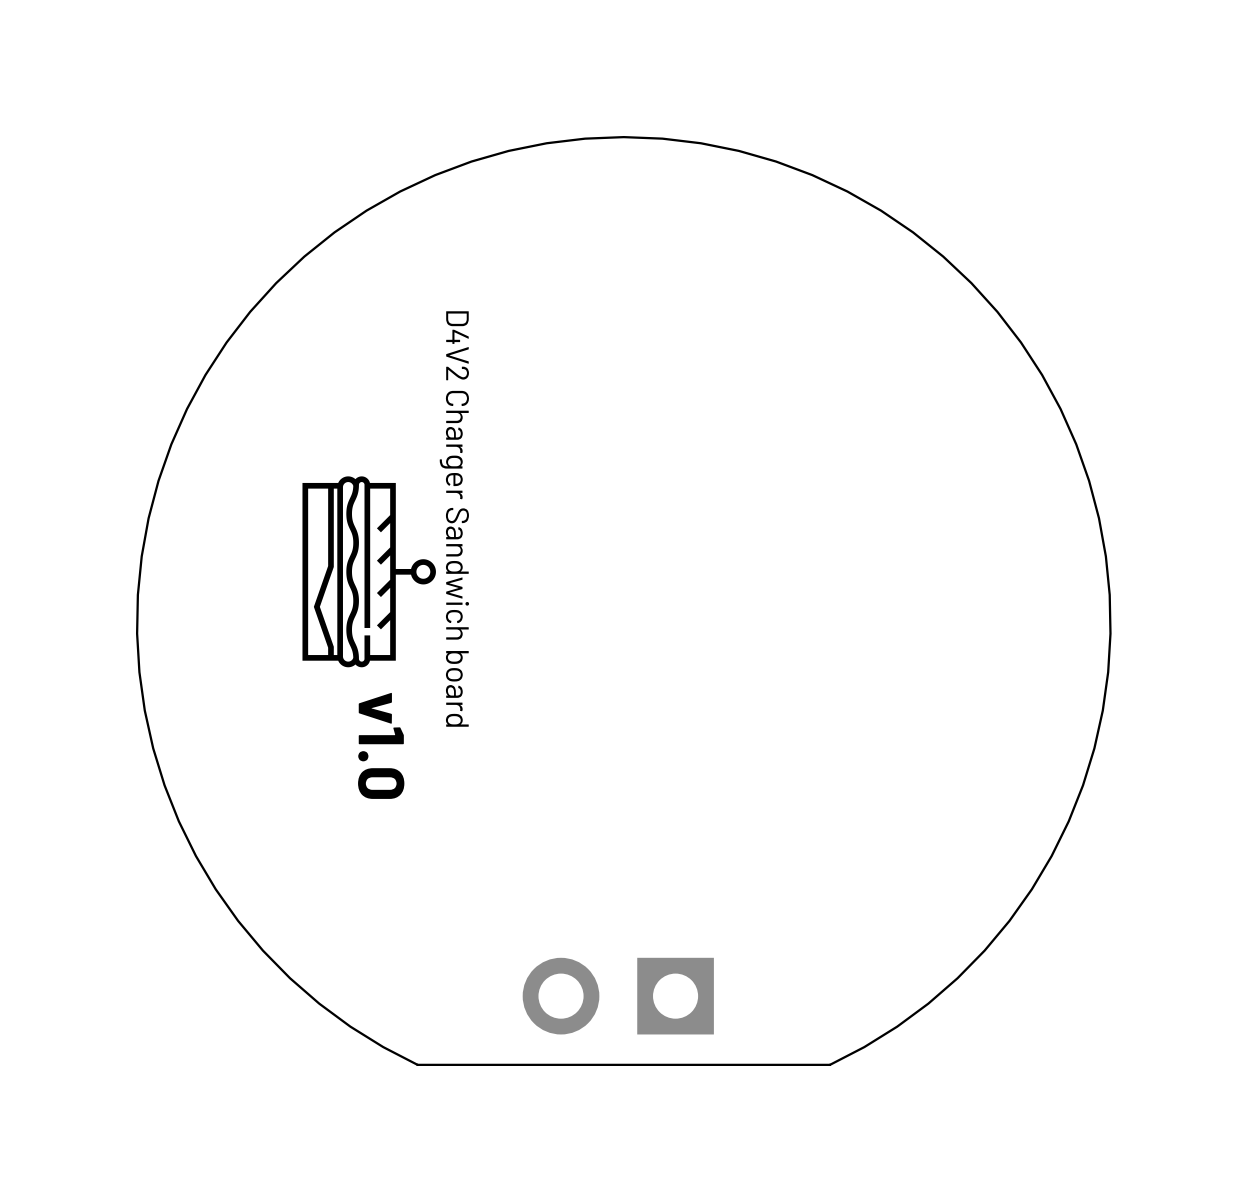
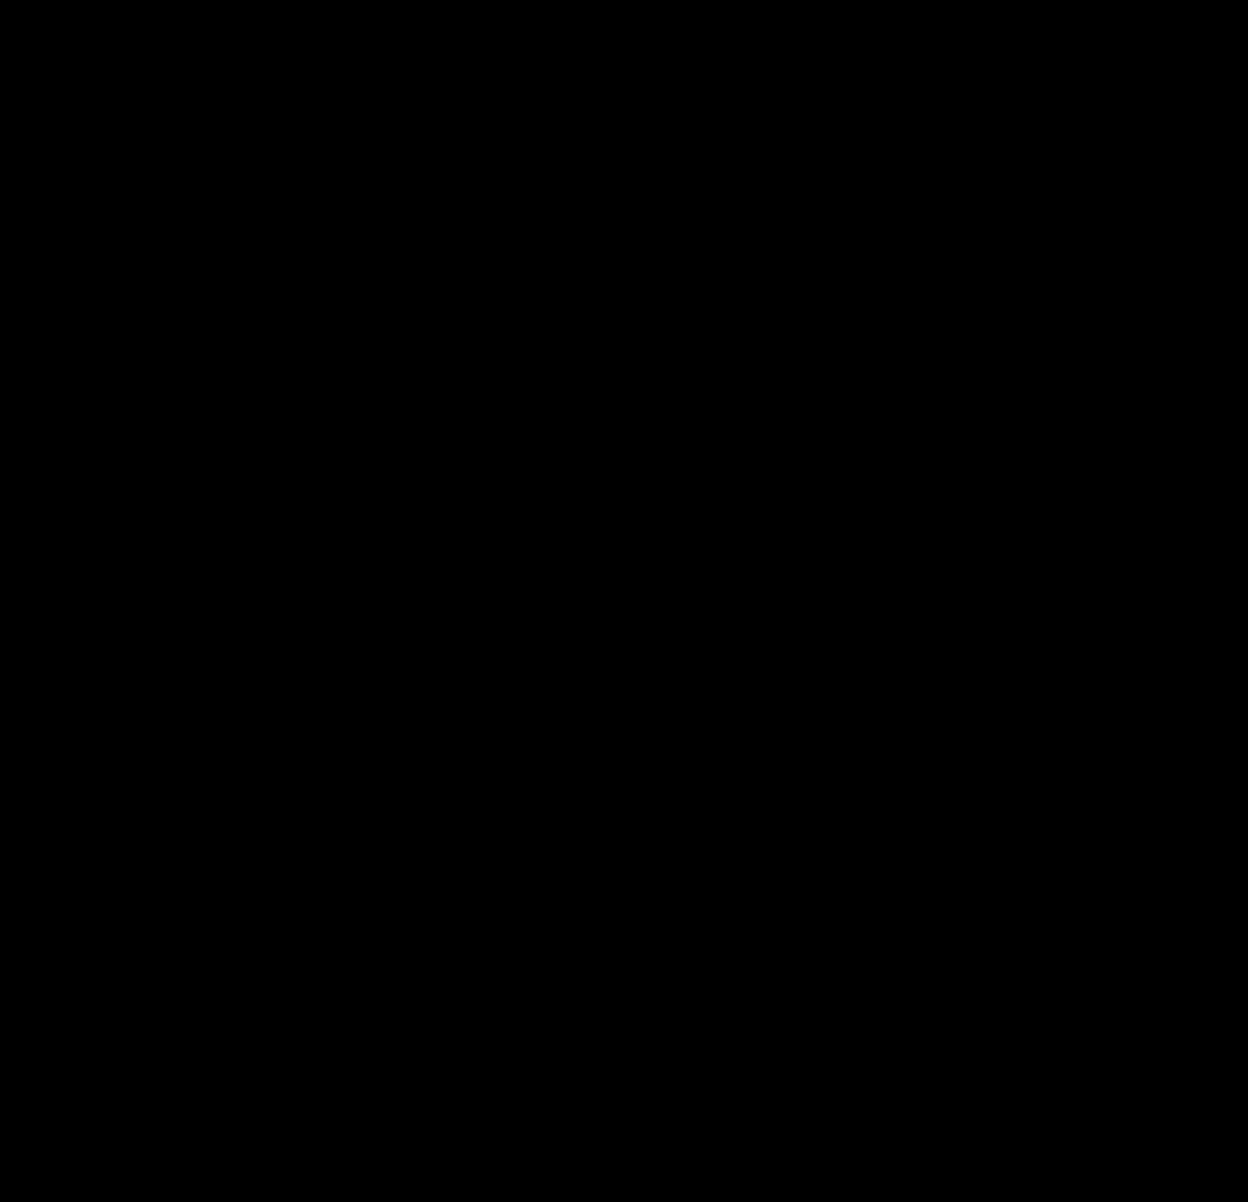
drawing: [302, 476, 436, 668] -> none
text: D4V2 Charger Sandwich board (454, 519) -> none
text: v1.0 (381, 745) -> none
part: (618, 996) -> none
board edge: (829, 1064) (417, 1064) (383, 1047) (350, 1026) (319, 1003) (290, 978) (262, 950) (238, 920) (215, 889) (195, 856) (178, 821) (164, 785) (153, 748) (144, 710) (139, 672) (137, 633) (137, 594) (141, 556) (148, 518) (158, 480) (171, 444) (187, 408) (205, 374) (226, 342) (250, 311) (276, 283) (304, 256) (334, 232) (366, 210) (400, 191) (435, 175) (471, 161) (508, 150) (546, 143) (585, 138) (623, 137) (662, 138) (700, 143) (738, 150) (776, 161) (812, 175) (847, 191) (881, 210) (913, 232) (943, 256) (971, 283) (997, 311) (1021, 342) (1042, 374) (1060, 408) (1076, 444) (1089, 480) (1098, 518) (1105, 556) (1109, 594) (1110, 633) (1108, 672) (1102, 710) (1094, 748) (1083, 785) (1068, 821) (1051, 856) (1031, 889) (1009, 920) (984, 950) (957, 978) (928, 1003) (897, 1026) (864, 1047) (829, 1064) -> none

